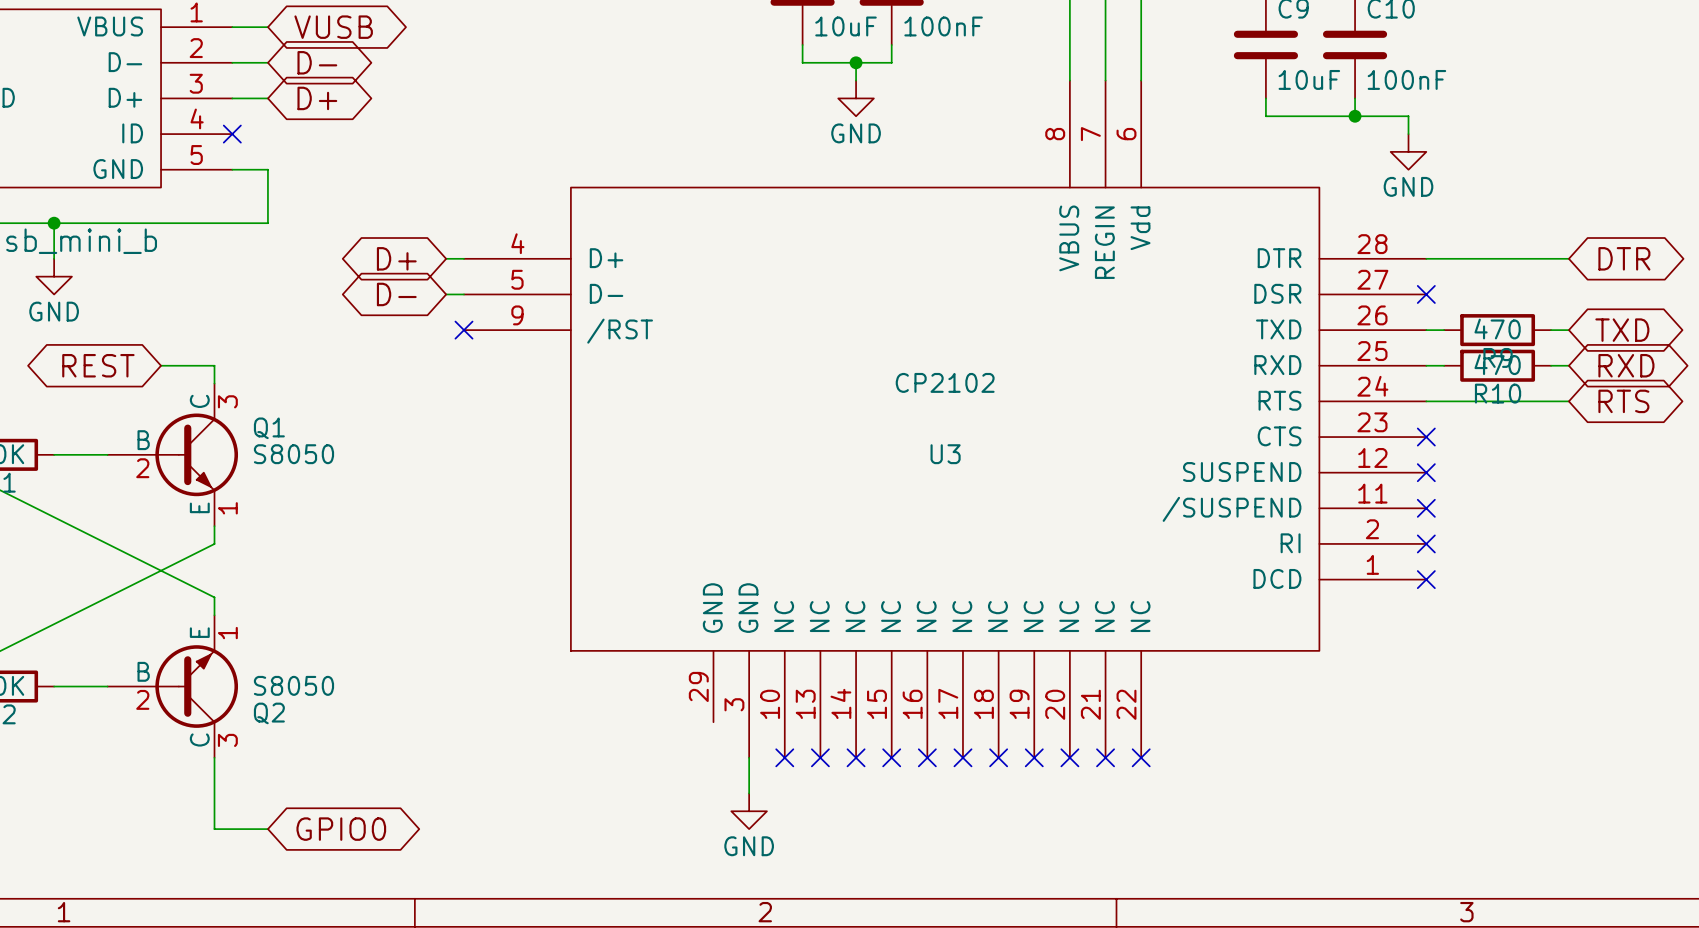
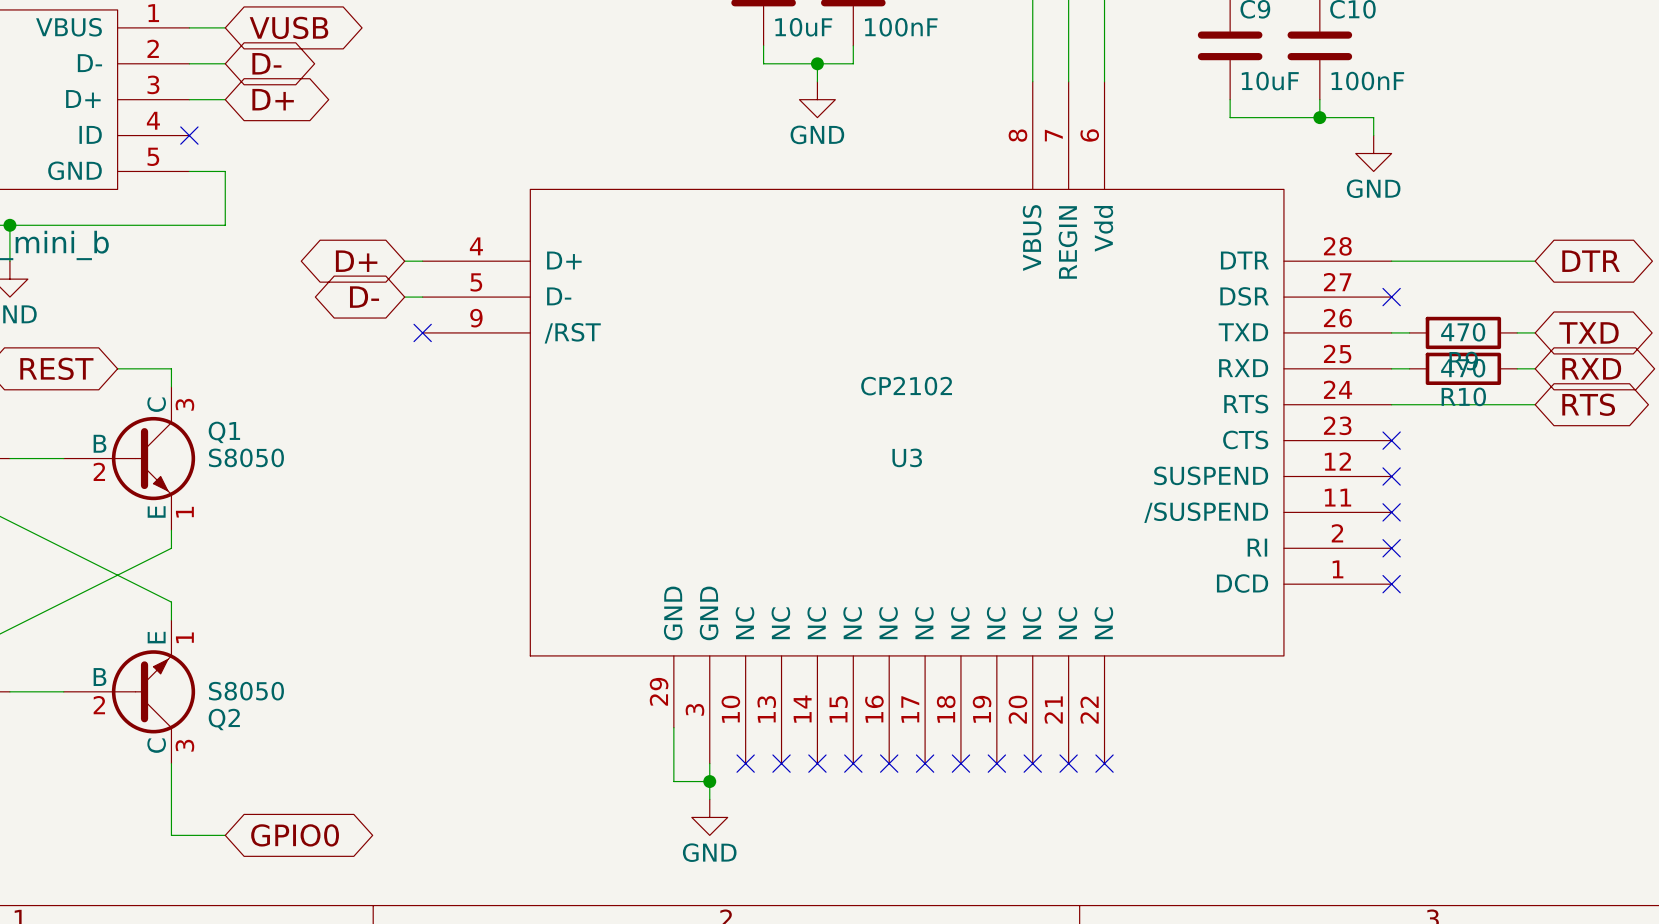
wire: none -> (673, 727) (673, 781) (709, 781)
junction: none -> (709, 781)

